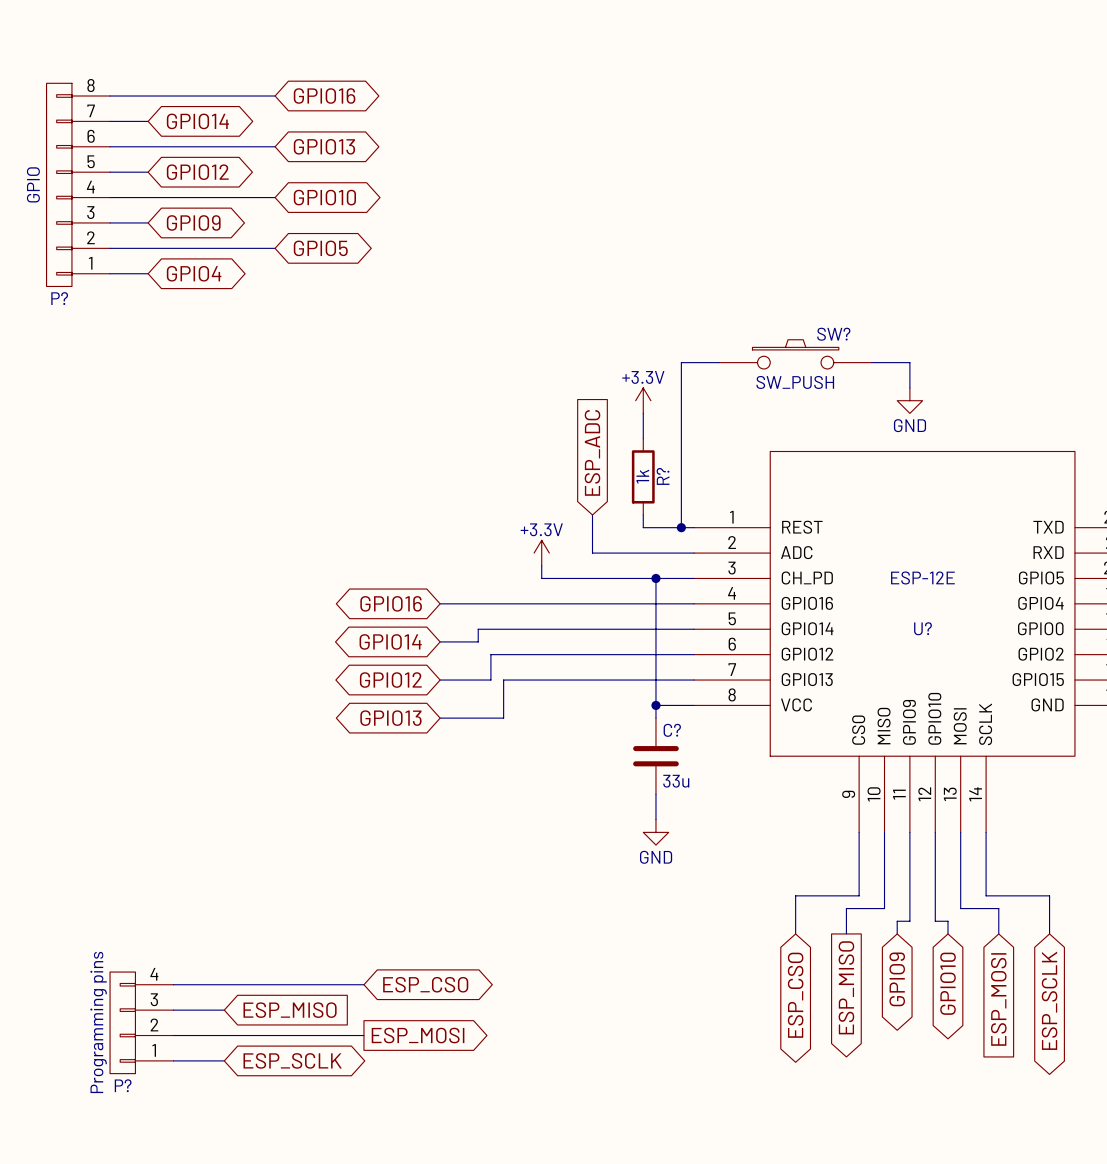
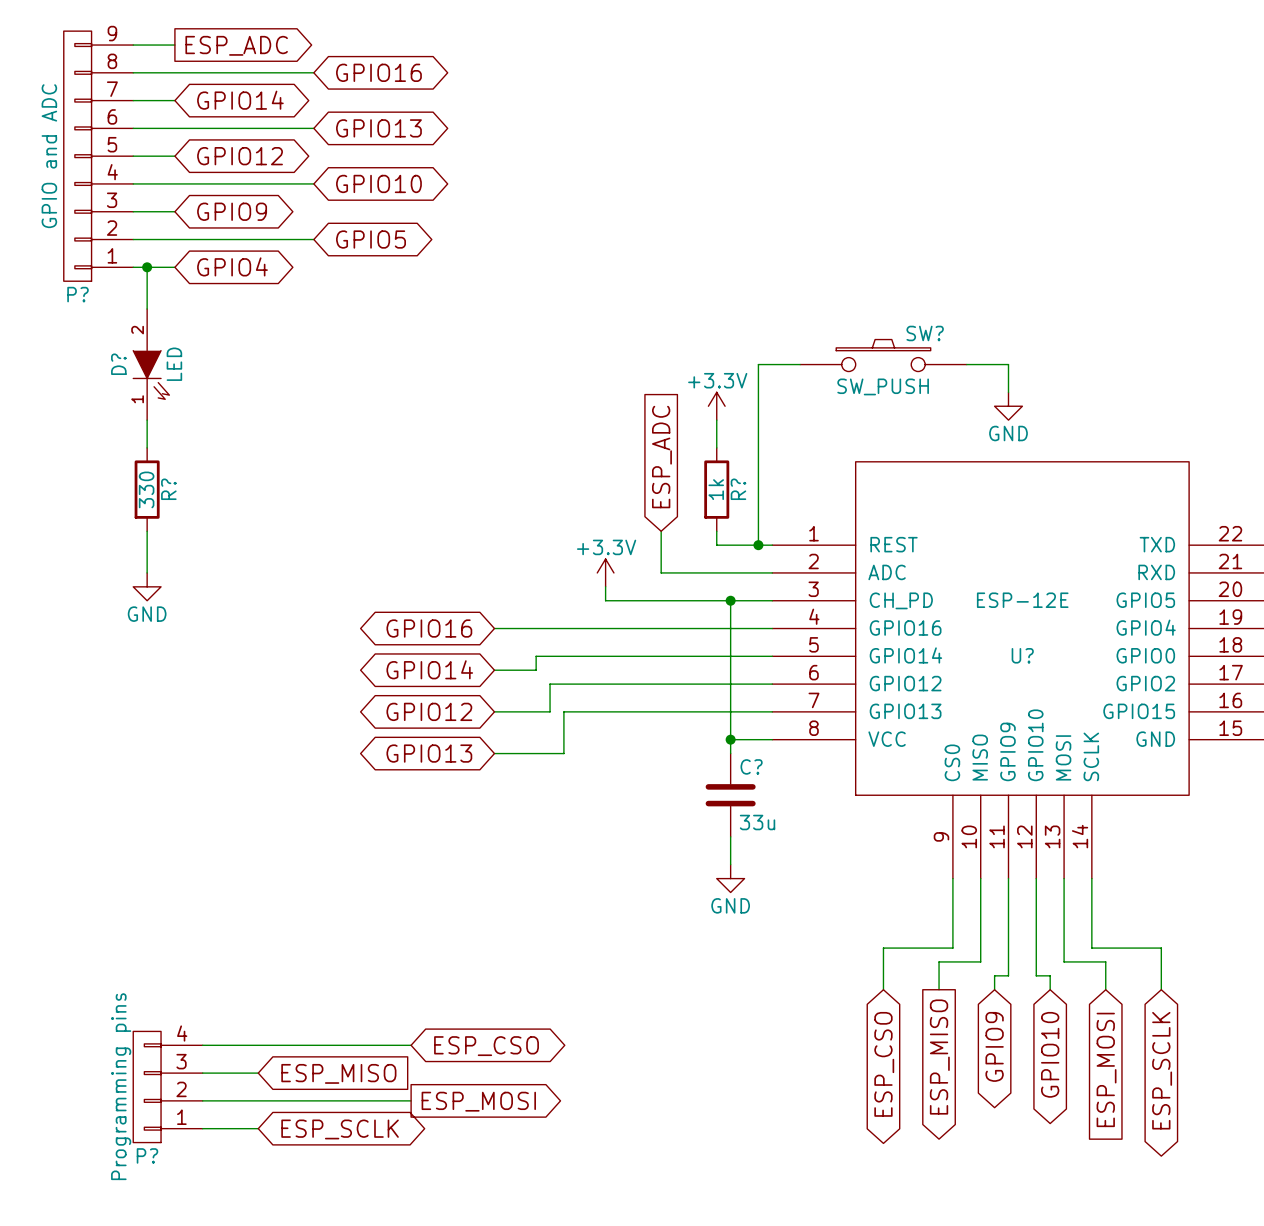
wire: none -> (133, 45) (174, 45)
global label: none -> ESP_ADC (236, 45)
P?: none -> GPIO and ADC (98, 156)
P?: GPIO (78, 184) -> none
wire: none -> (147, 267) (147, 308)
junction: none -> (147, 267)
D?: none -> LED (151, 364)
wire: none -> (147, 420) (147, 447)
R?: none -> 330 (147, 489)
wire: none -> (147, 531) (147, 572)
power symbol: none -> GND (147, 586)

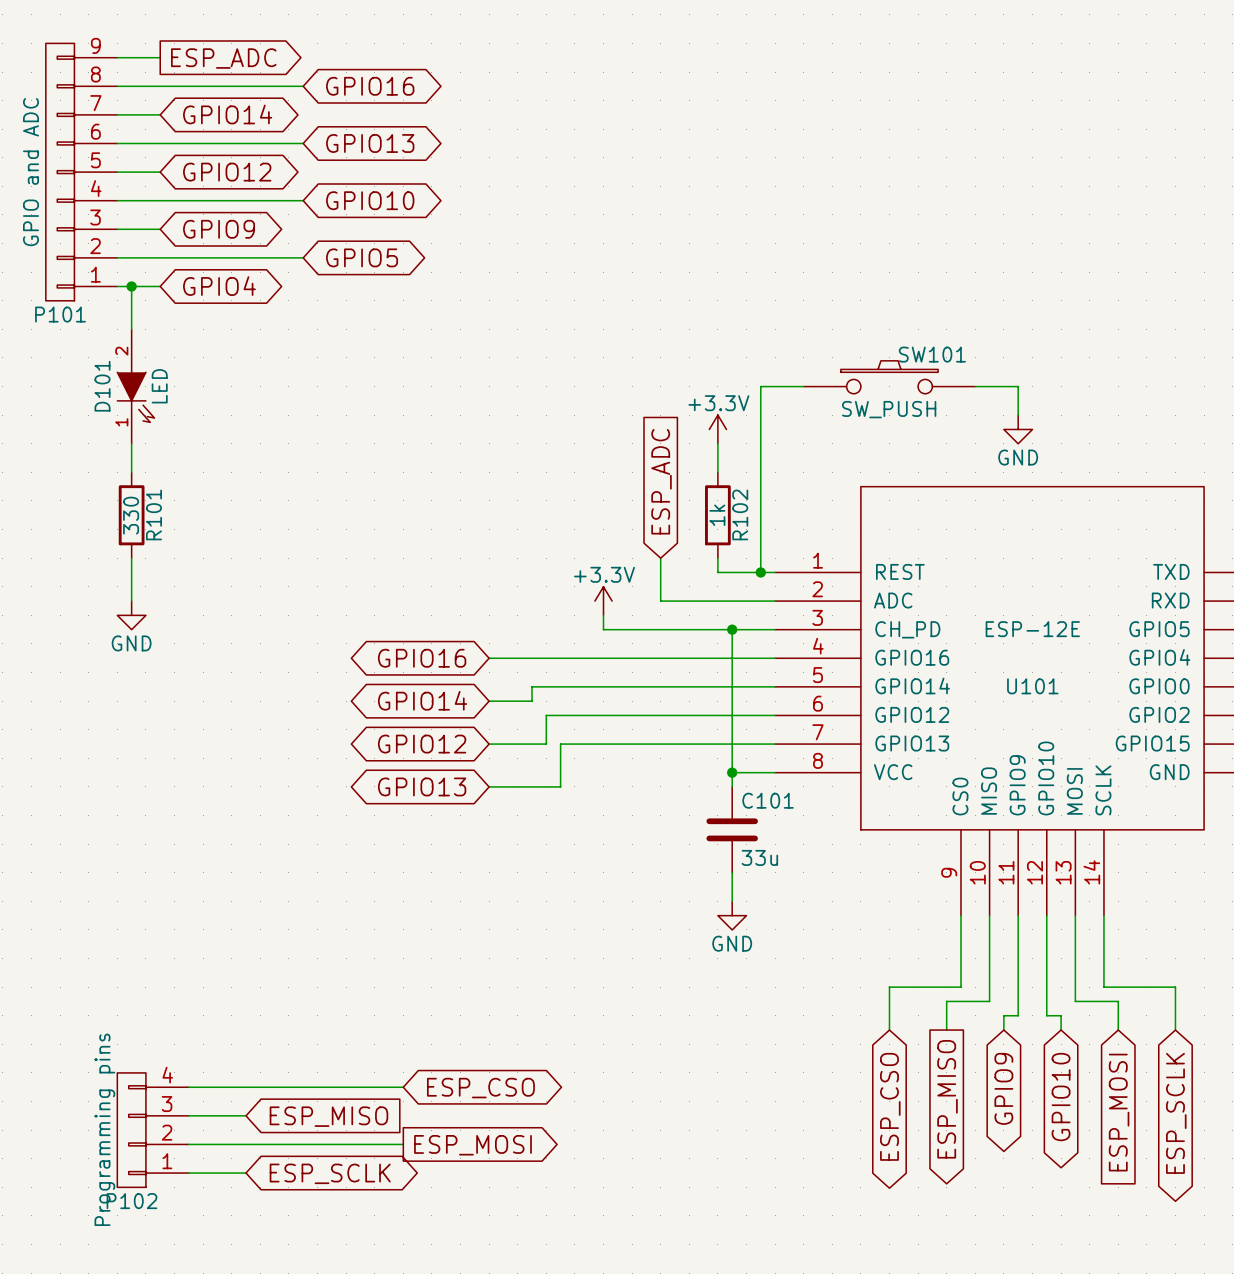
P? name: P? (78, 294) -> P101 (60, 314)
SW? name: SW? (925, 333) -> SW101 (932, 354)
D? name: D? (118, 364) -> D101 (102, 386)
R? name: R? (168, 489) -> R101 (153, 514)
R? name: R? (738, 489) -> R102 (740, 514)
U? name: U? (1022, 655) -> U101 (1032, 686)
C? name: C? (751, 766) -> C101 (768, 800)
P? name: P? (147, 1155) -> P102 (131, 1201)

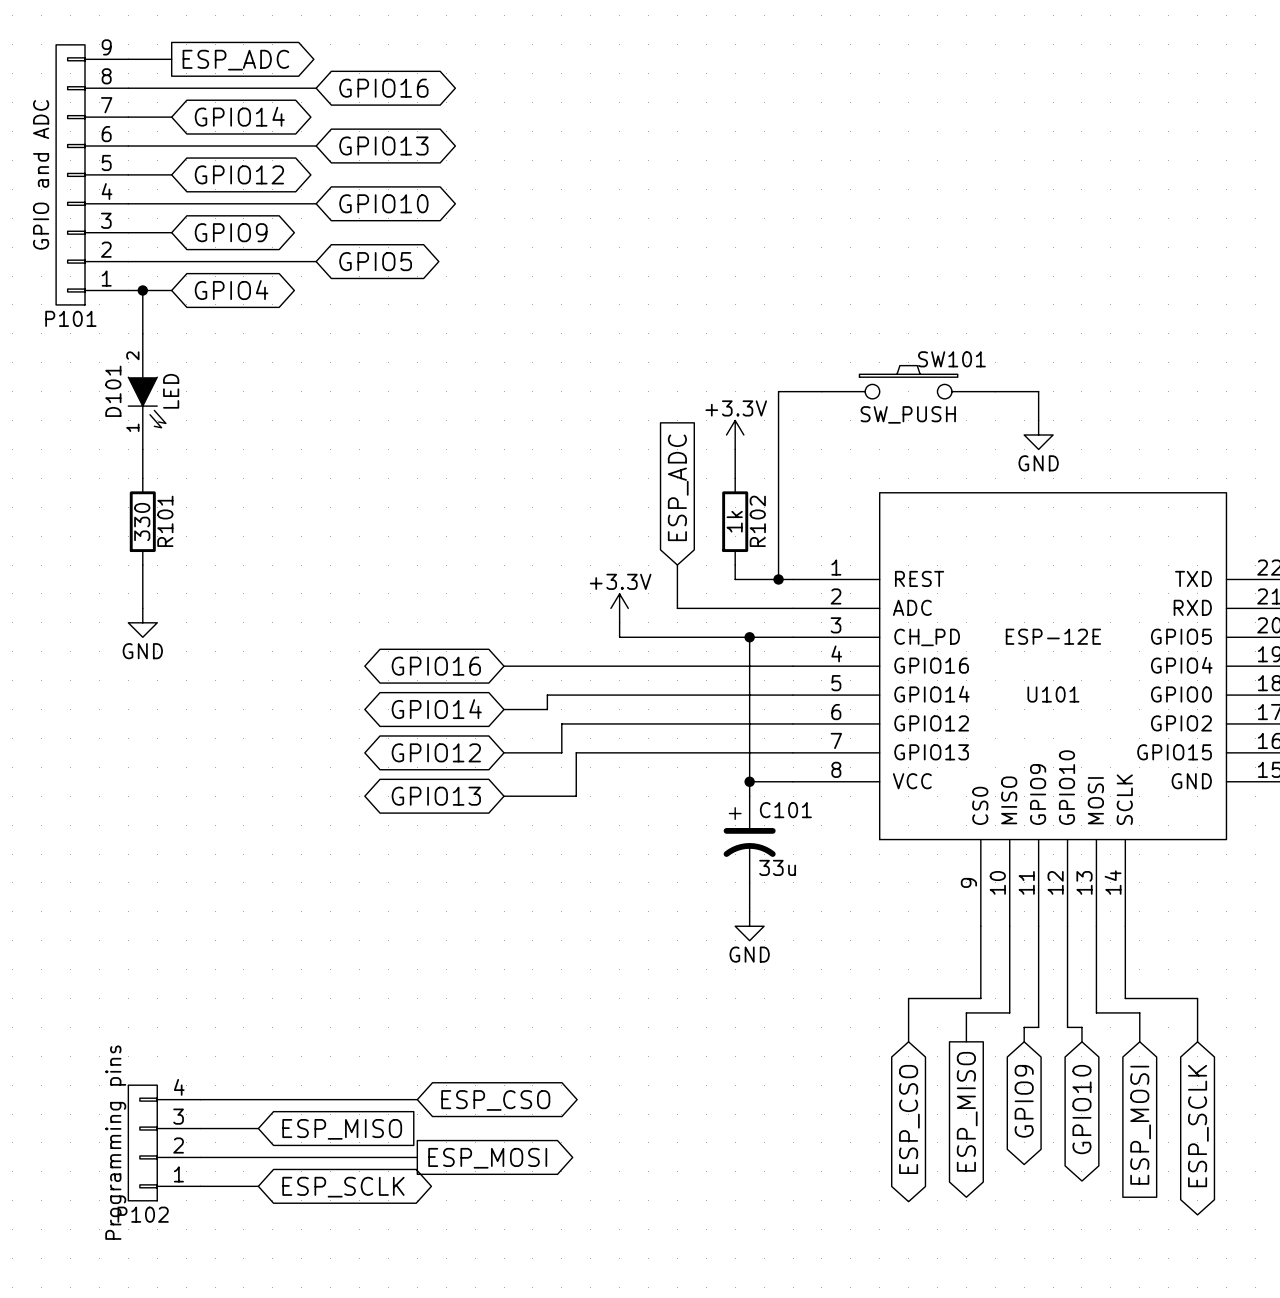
C101 symbol: [706, 786, 758, 873] -> [723, 796, 776, 883]

